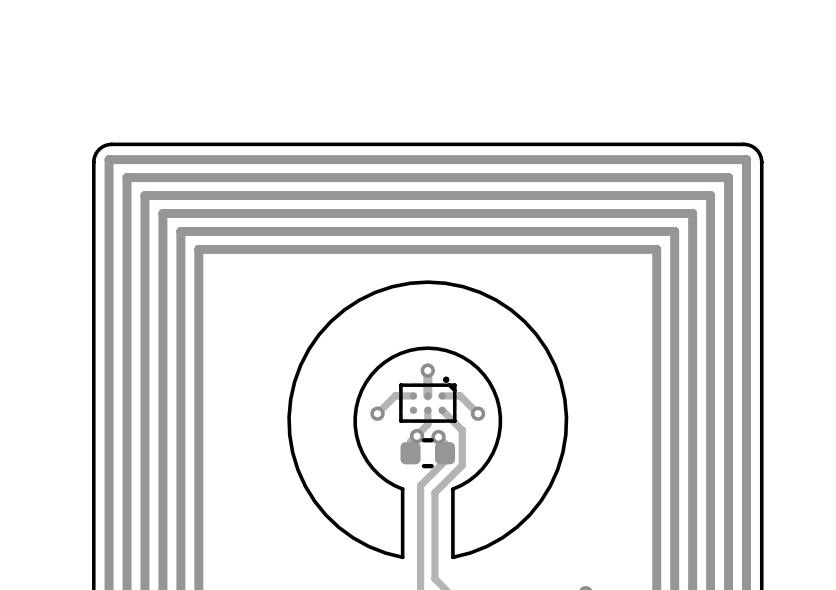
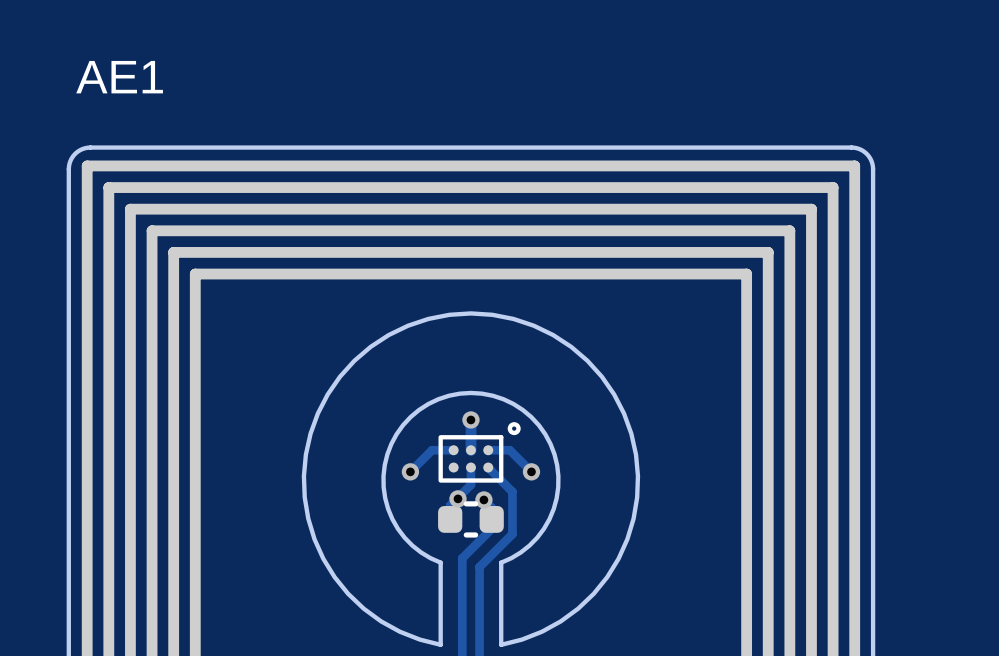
AE1 name: none -> AE1 (119, 77)
part footprint: [399, 376, 457, 423] -> [438, 422, 521, 483]

